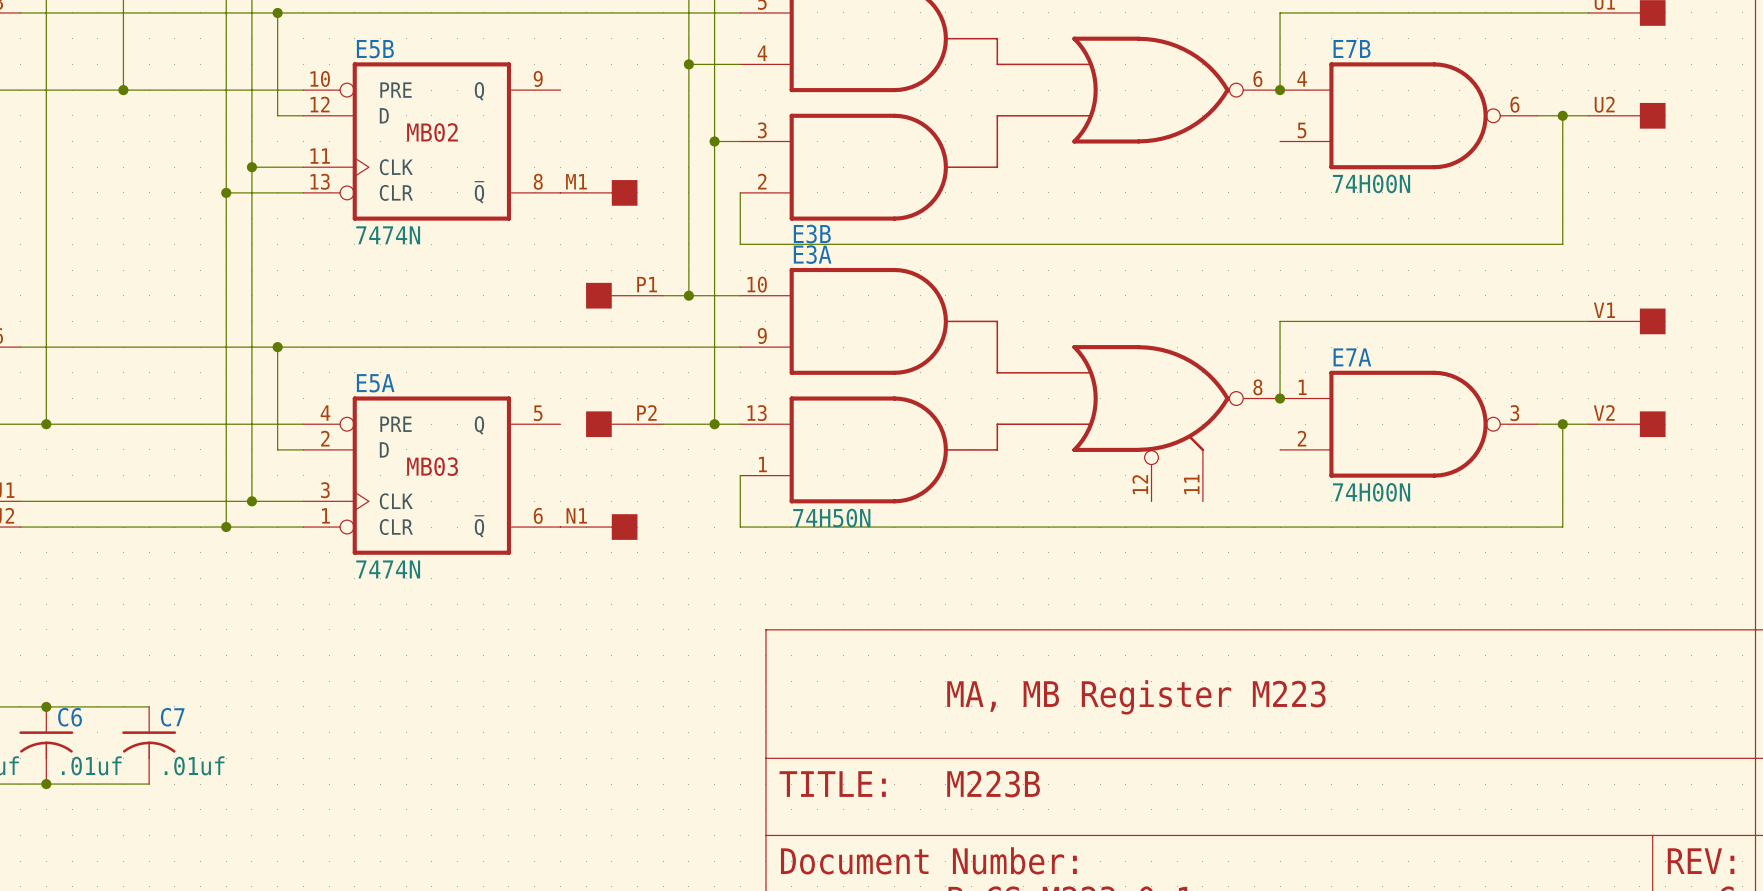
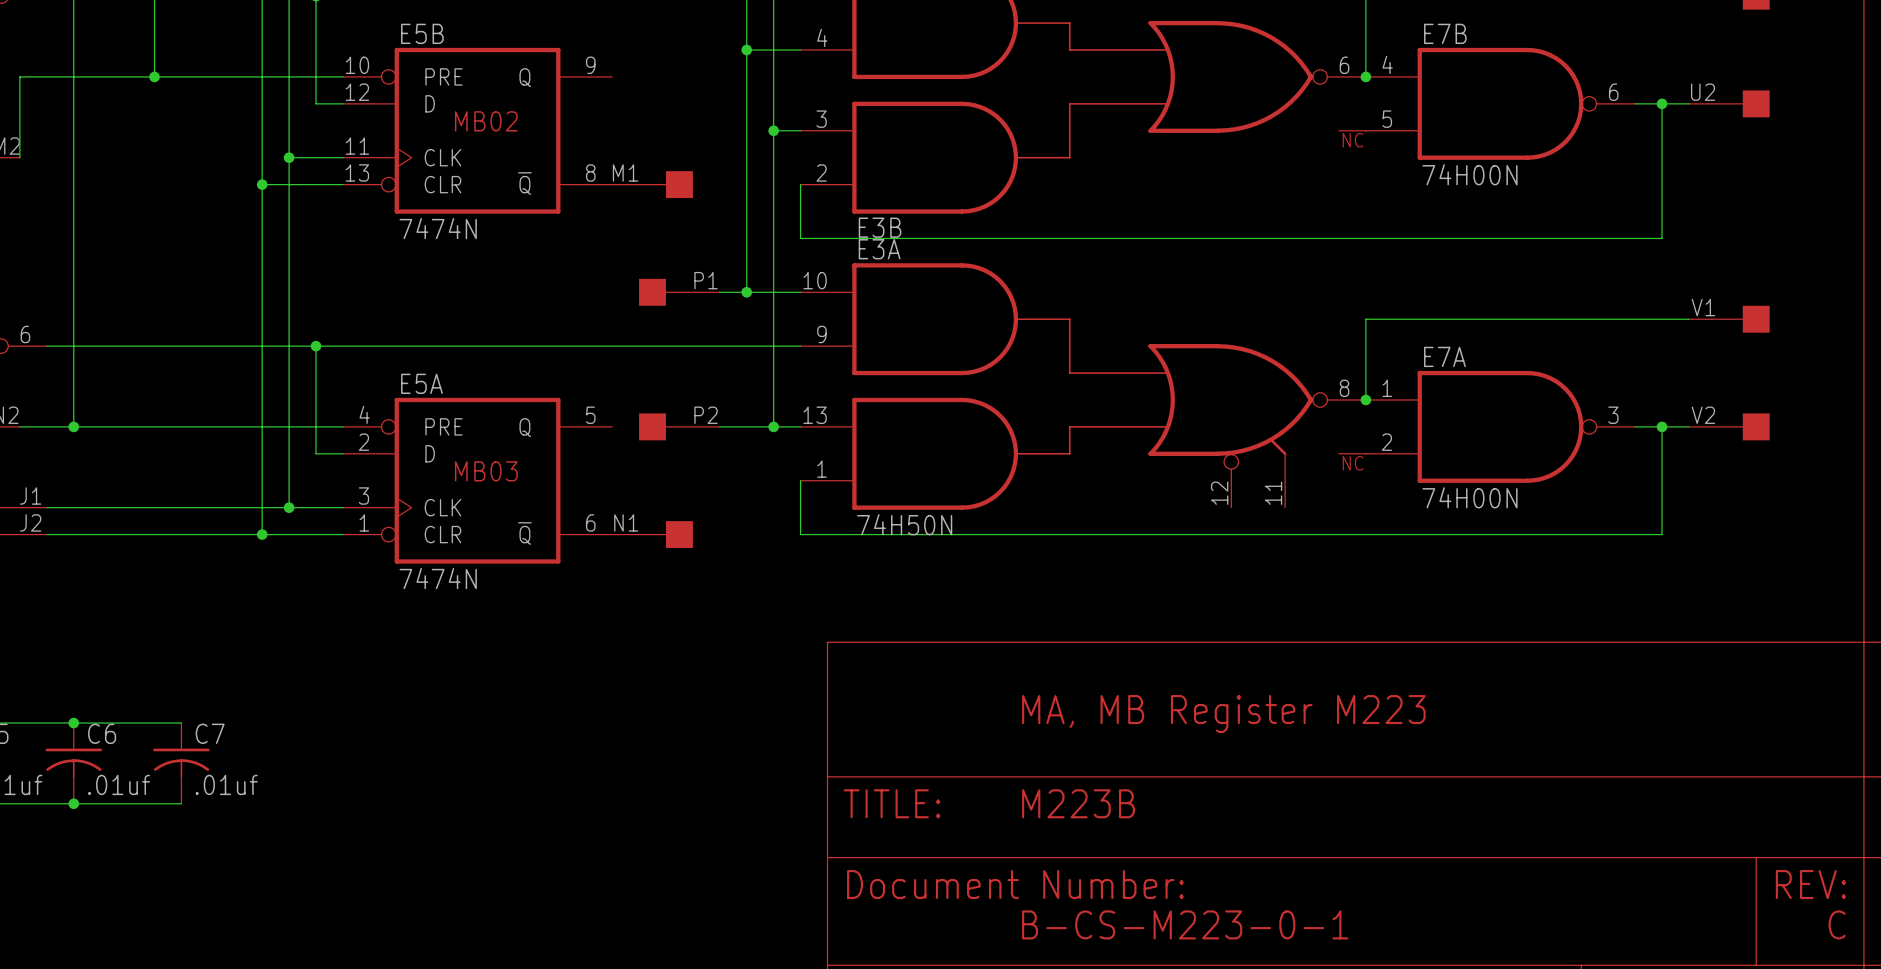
power symbol: none -> (1352, 130)
power symbol: none -> (1352, 453)

